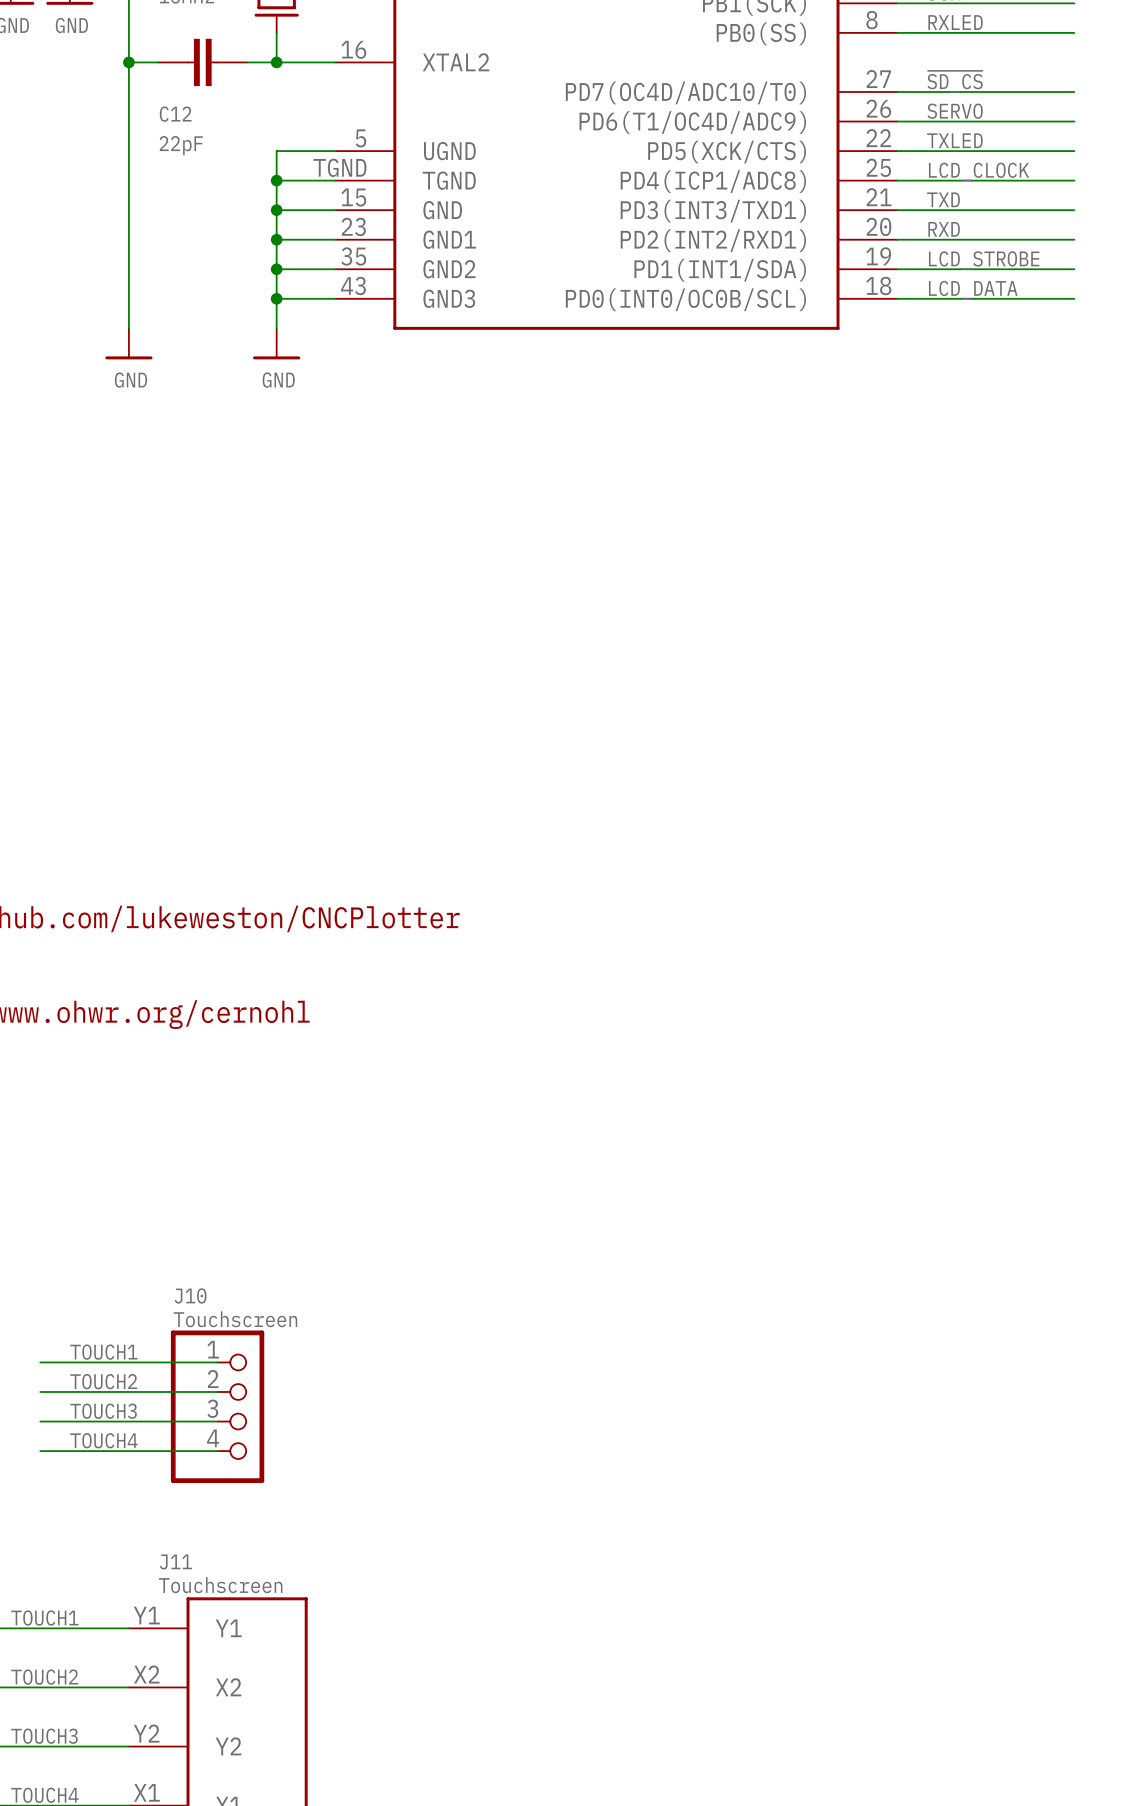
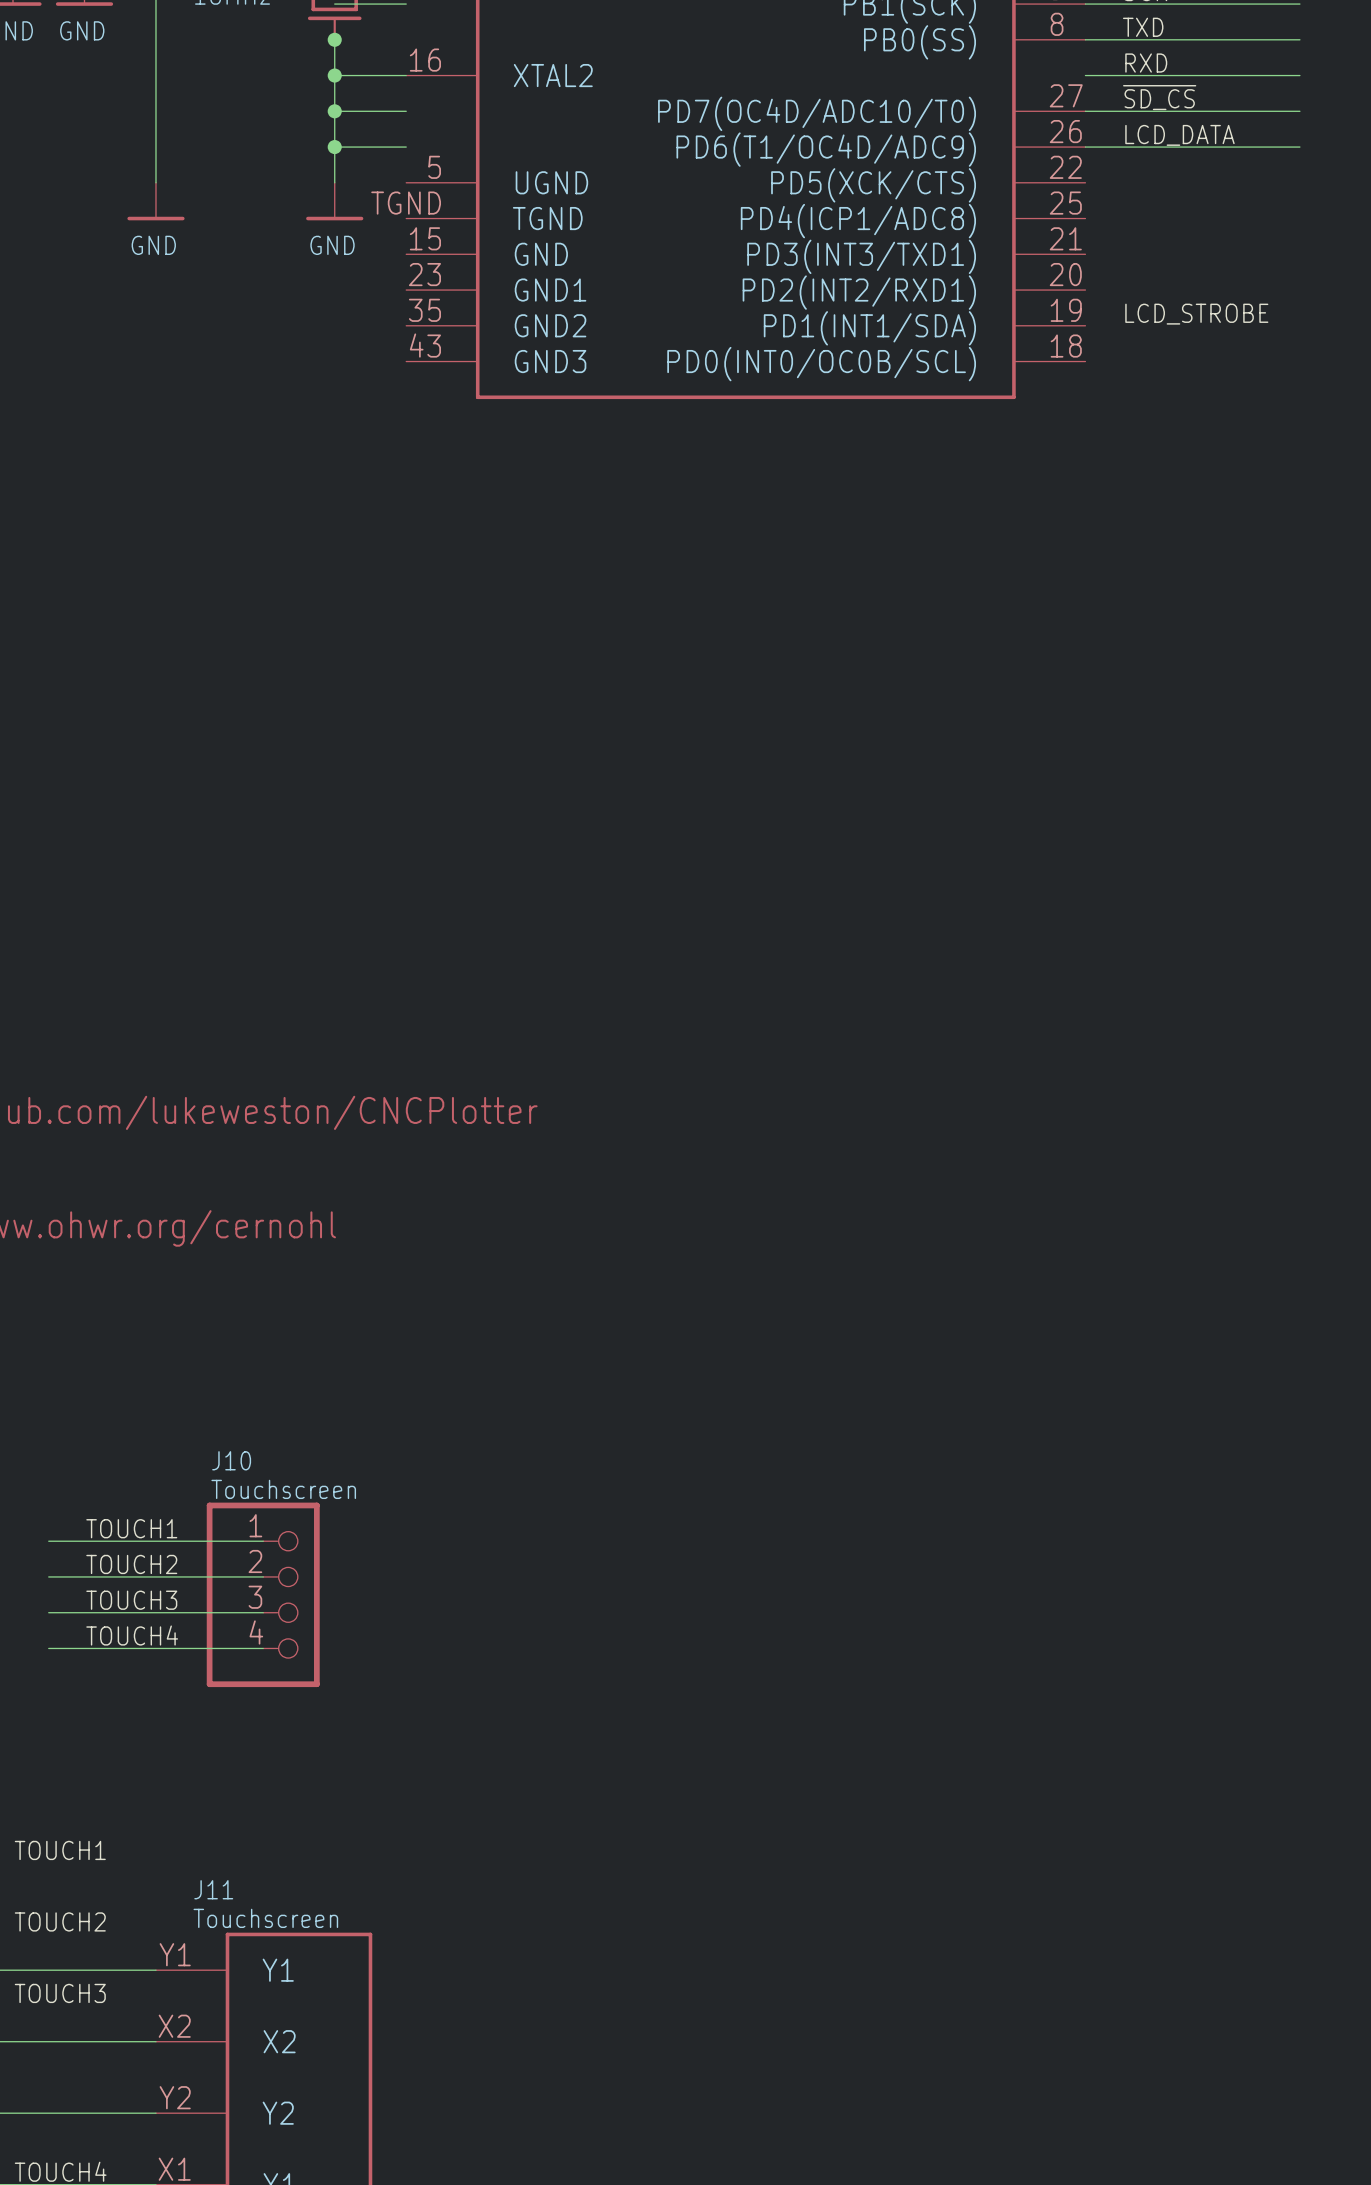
label: RXLED (955, 22) -> TXD (1143, 27)
junction: none -> (334, 39)
wire: (128, 62) (158, 62) -> none
junction: (128, 62) -> none
C12: 22pF (202, 62) -> none
wire: (247, 62) (276, 62) -> (334, 182) (334, 75)
junction: none -> (334, 111)
label: SERVO (955, 111) -> LCD_DATA (1179, 135)
junction: none -> (334, 147)
label: TXLED (954, 140) -> none
wire: (128, 151) (128, 328) -> none
wire: (335, 151) (276, 151) (276, 328) -> none
wire: (897, 151) (1074, 151) -> none
power symbol: none -> GND (155, 201)
power symbol: none -> GND (334, 201)
label: LCD_CLOCK (979, 171) -> none
wire: (276, 180) (335, 180) -> (334, 4) (406, 4)
junction: (276, 180) -> none
wire: (897, 180) (1074, 180) -> none
label: TXD (943, 199) -> none
wire: (276, 210) (335, 210) -> none
junction: (276, 210) -> none
wire: (897, 210) (1074, 210) -> none
label position: RXD (944, 229) -> RXD (1146, 63)
wire: (276, 239) (335, 239) -> none
junction: (276, 239) -> none
wire: (897, 239) (1074, 239) -> (1085, 75) (1299, 75)
wire: (276, 269) (335, 269) -> (334, 111) (406, 111)
junction: (276, 269) -> none
wire: (897, 269) (1074, 269) -> none
label: LCD_DATA (973, 290) -> none
wire: (276, 298) (335, 298) -> (334, 147) (406, 147)
junction: (276, 298) -> none
wire: (897, 298) (1074, 298) -> none
power symbol: GND (128, 343) -> none
power symbol: GND (276, 343) -> none
label: none -> TOUCH1 (131, 1528)
label: TOUCH1 (103, 1352) -> TOUCH4 (132, 1635)
label position: TOUCH2 (103, 1381) -> TOUCH2 (131, 1564)
wire: (40, 1391) (217, 1391) -> (48, 1576) (263, 1576)
J10 position: (217, 1406) -> (263, 1594)
label position: TOUCH3 (103, 1411) -> TOUCH3 (131, 1600)
wire: (40, 1421) (217, 1421) -> (48, 1612) (263, 1612)
label: TOUCH4 (104, 1440) -> none
wire: (40, 1451) (217, 1451) -> (48, 1541) (263, 1541)
label position: TOUCH1 (44, 1618) -> TOUCH1 (60, 1850)
label position: TOUCH2 (44, 1677) -> TOUCH2 (60, 1921)
label position: TOUCH3 (44, 1736) -> TOUCH3 (60, 1993)

